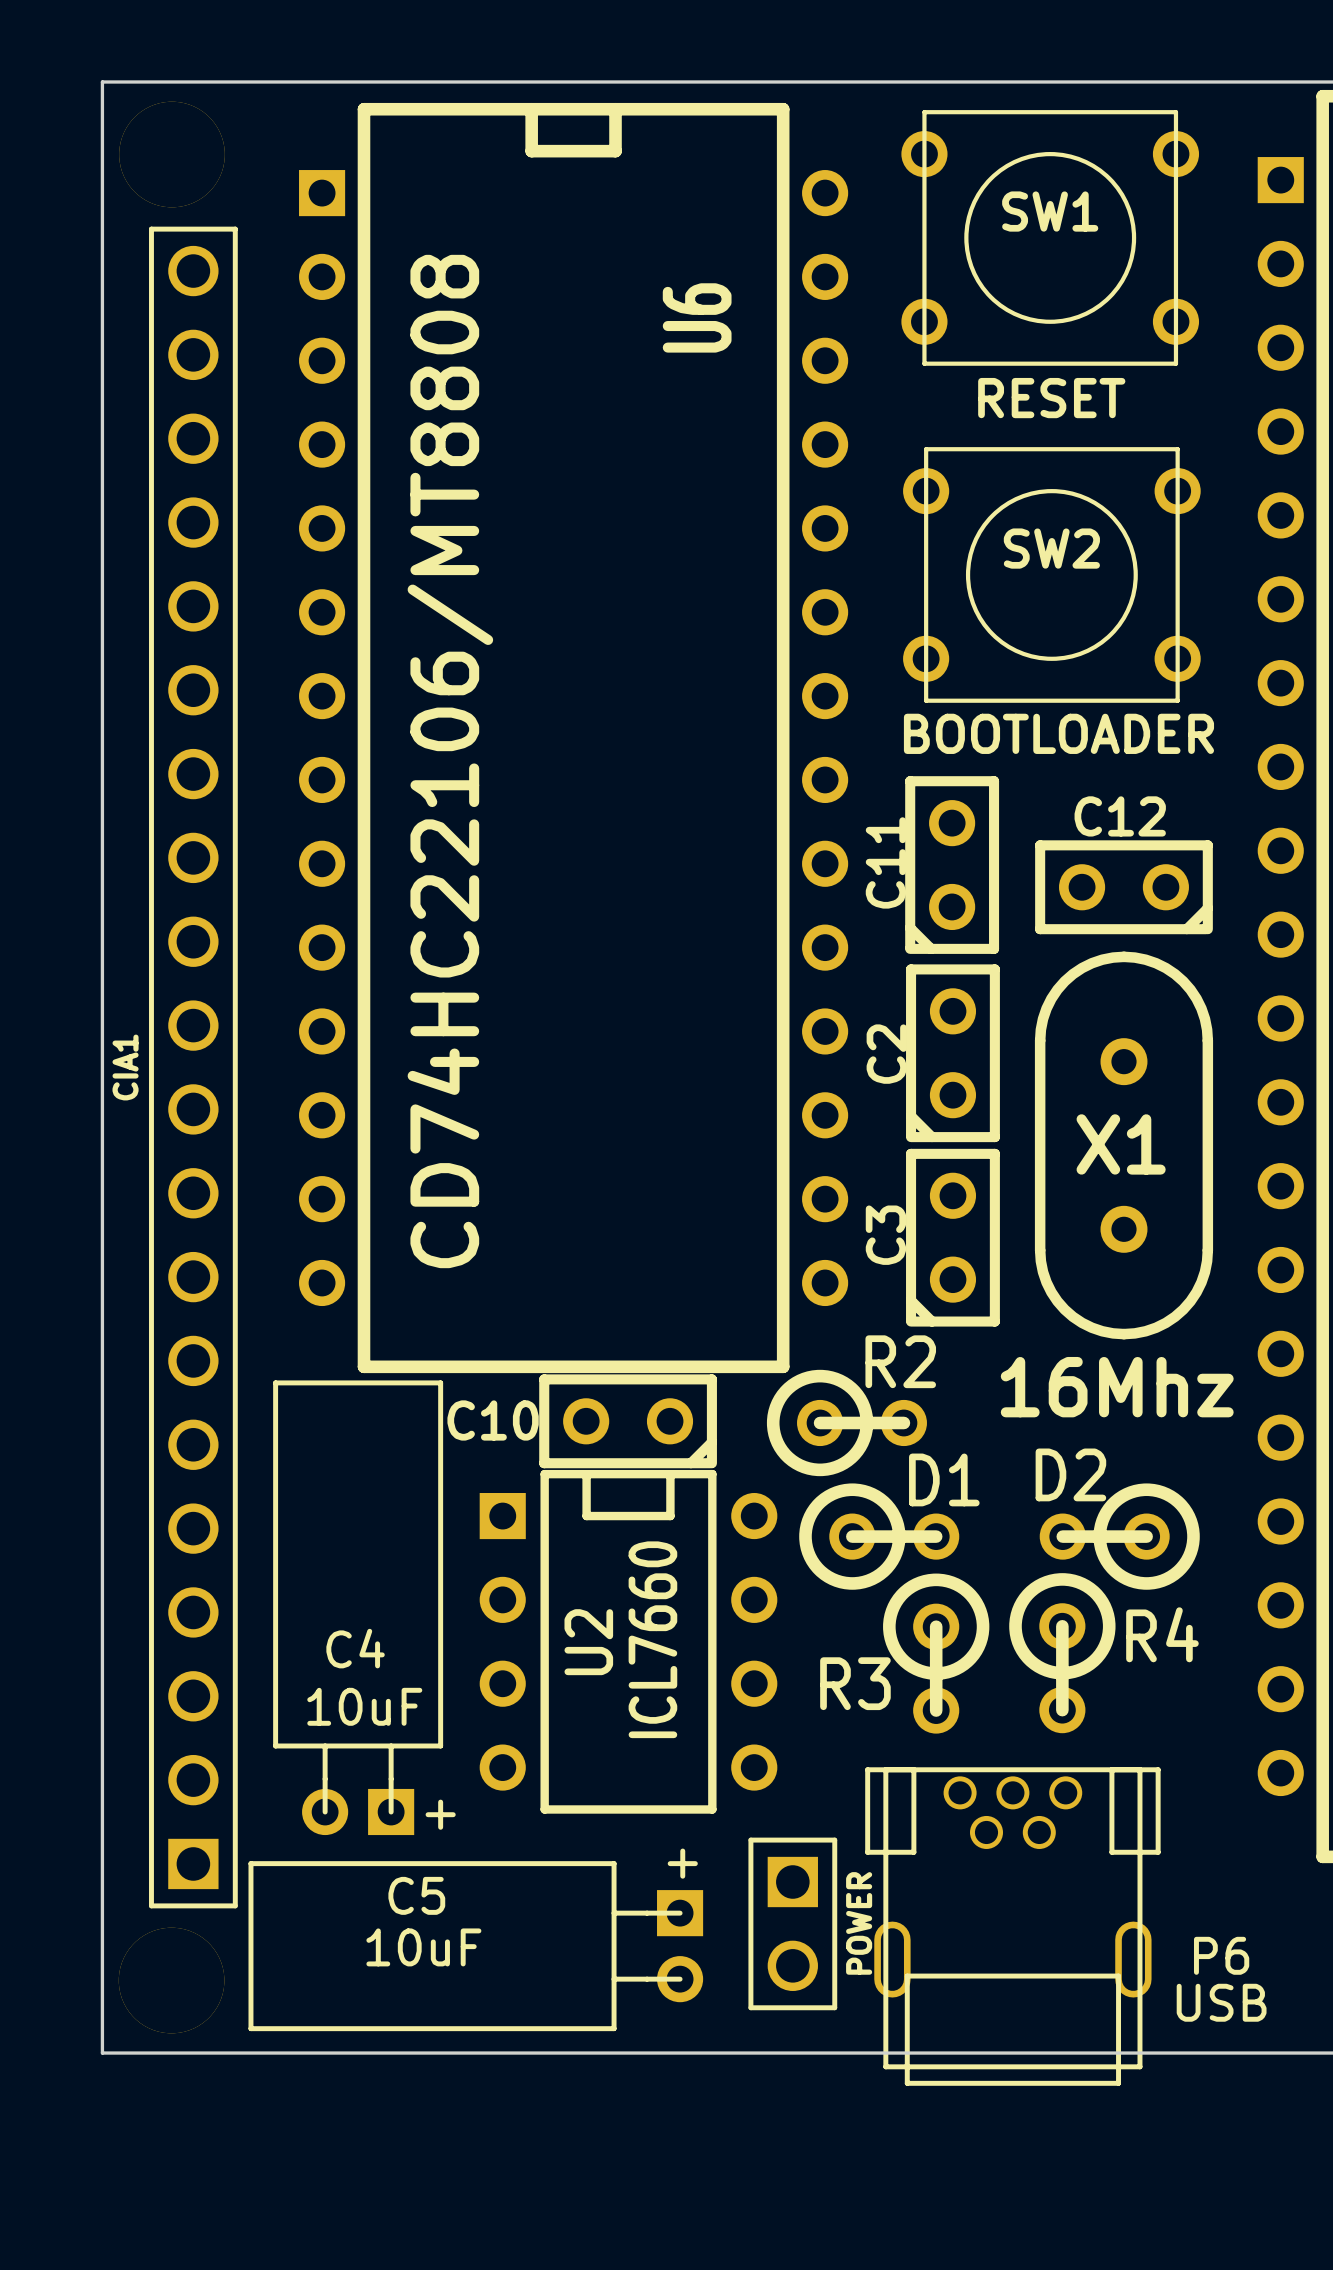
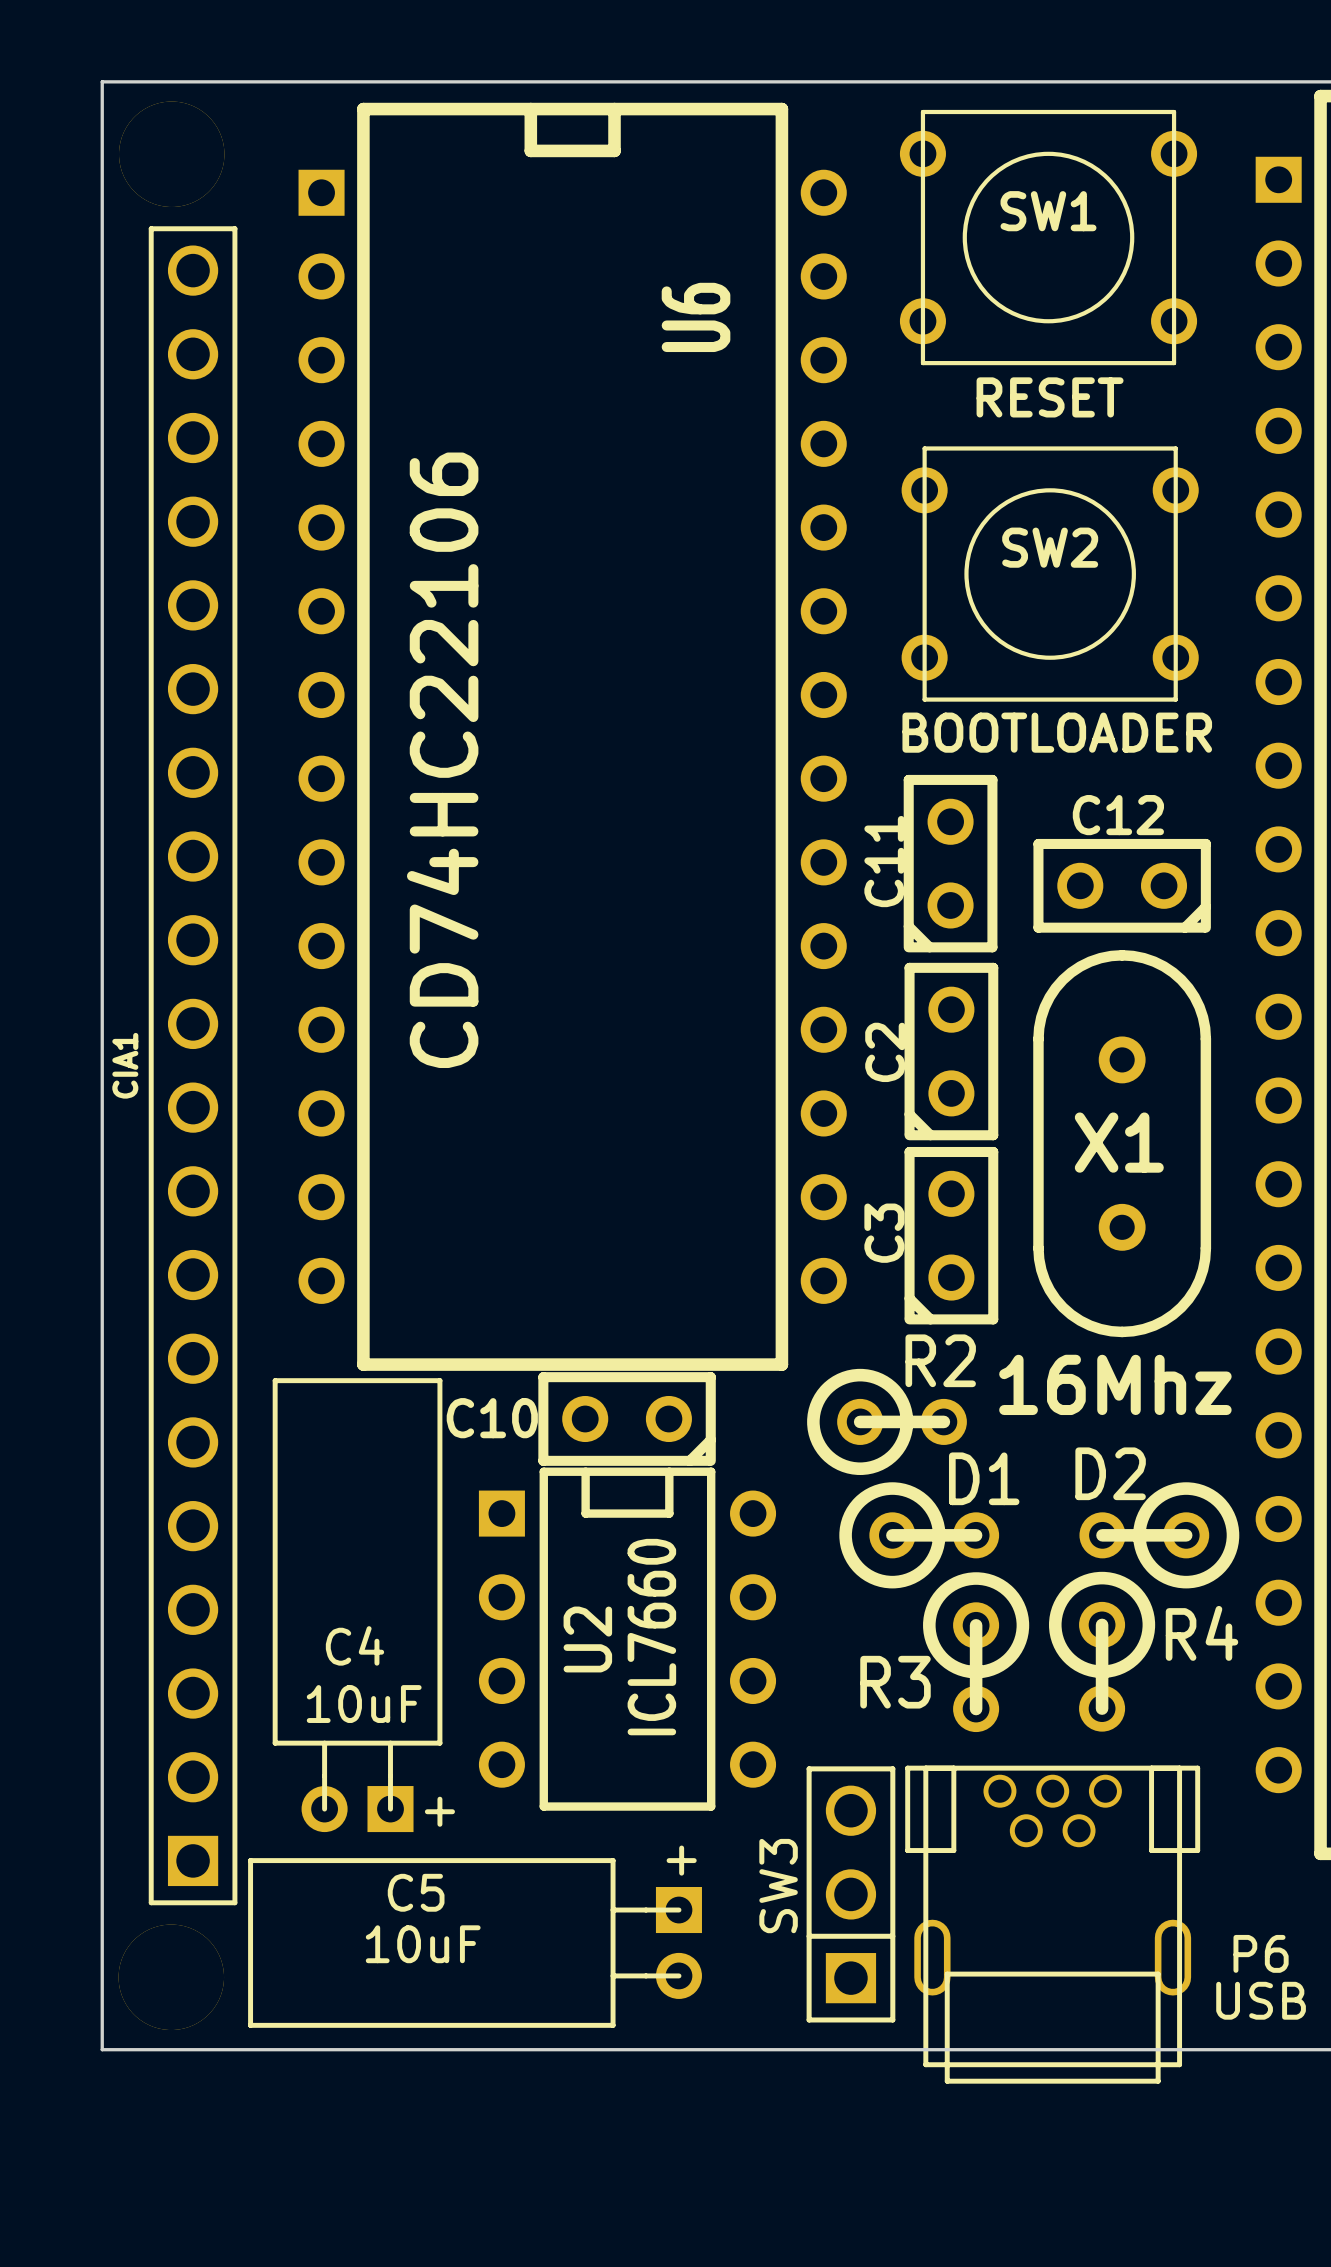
U6 value: CD74HC22106/MT8808 (450, 761) -> CD74HC22106 (442, 760)
R2 position: (846, 1422) -> (887, 1421)
D1 position: (879, 1536) -> (919, 1535)
D2 position: (1119, 1536) -> (1159, 1535)
R3 position: (936, 1653) -> (976, 1652)
R4 position: (1062, 1653) -> (1102, 1651)
SW3: none -> (850, 1894)
part: POWER (792, 1923) -> none
P6 position: (1012, 1926) -> (1052, 1924)

